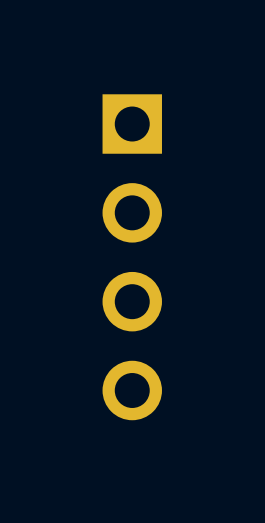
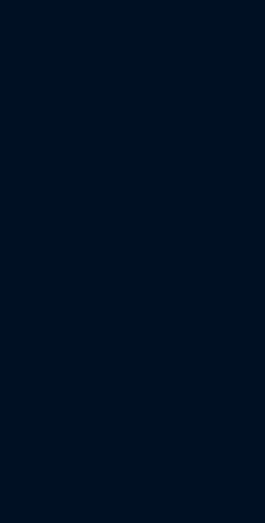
part: (132, 257) -> none

